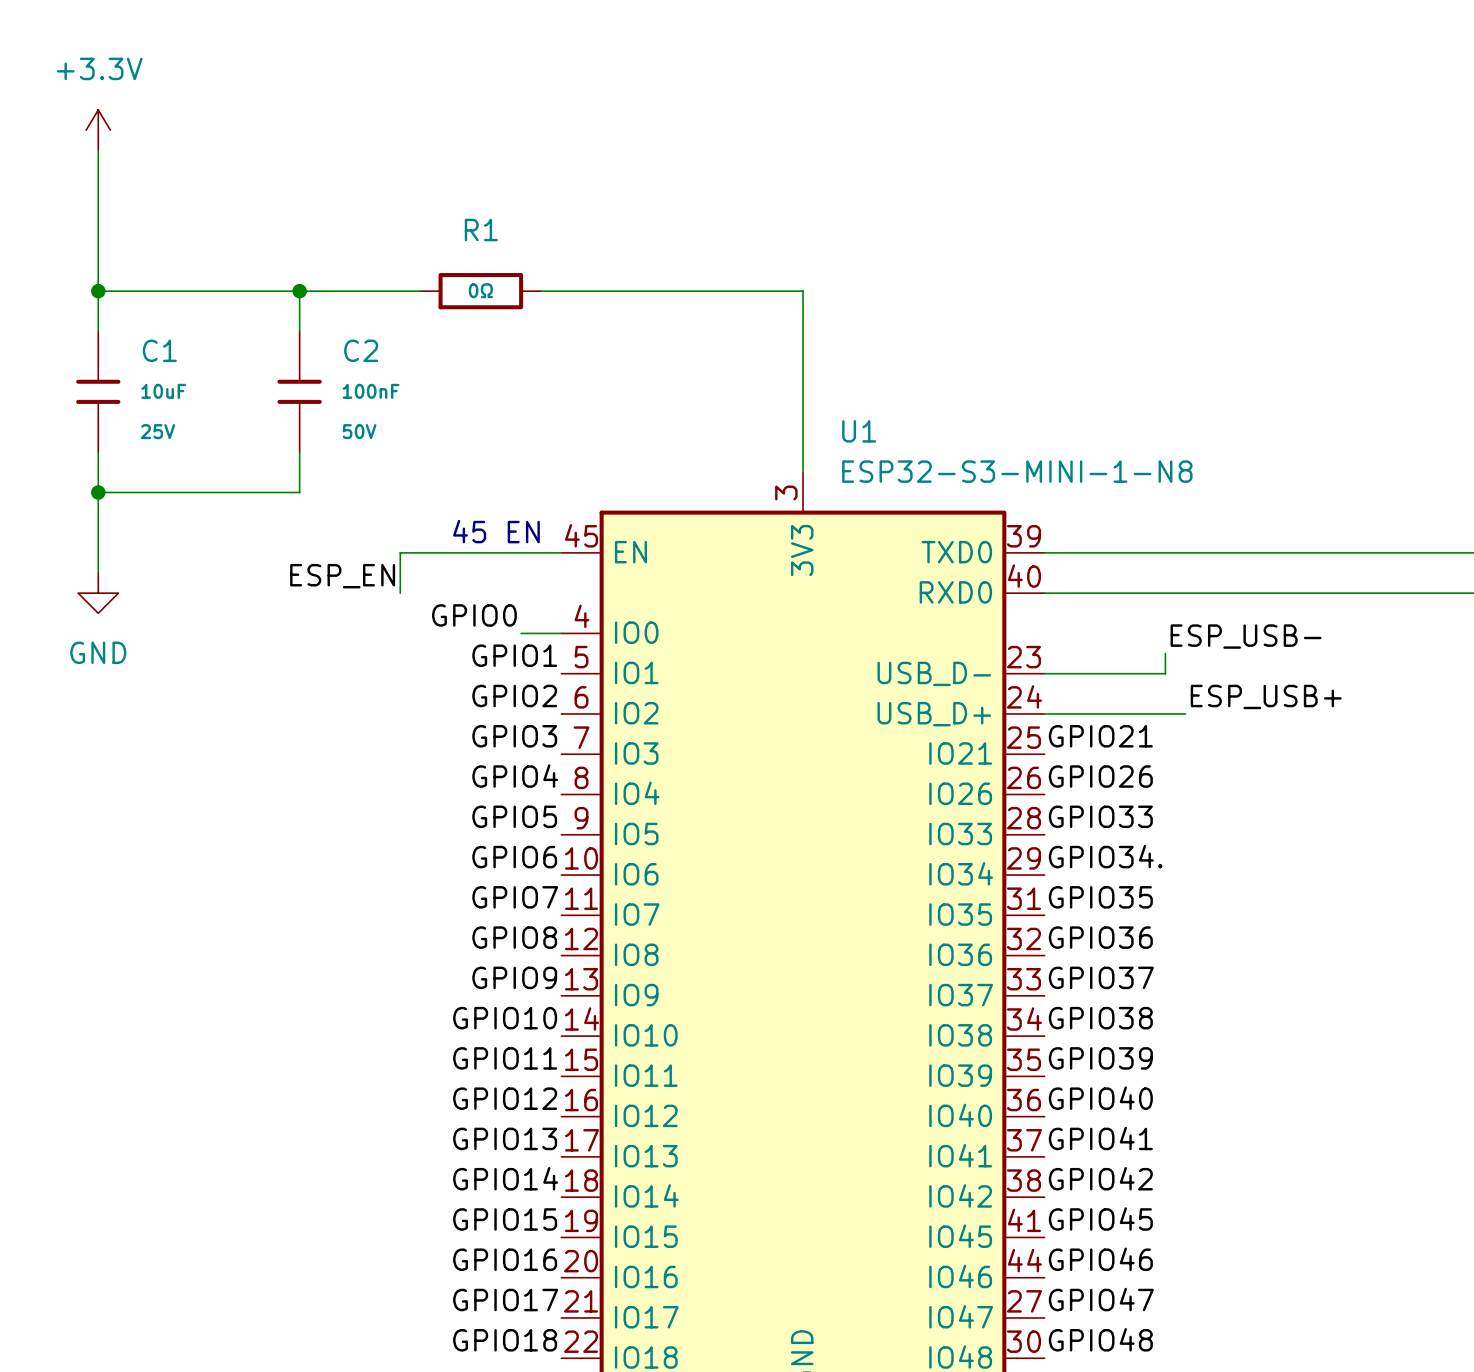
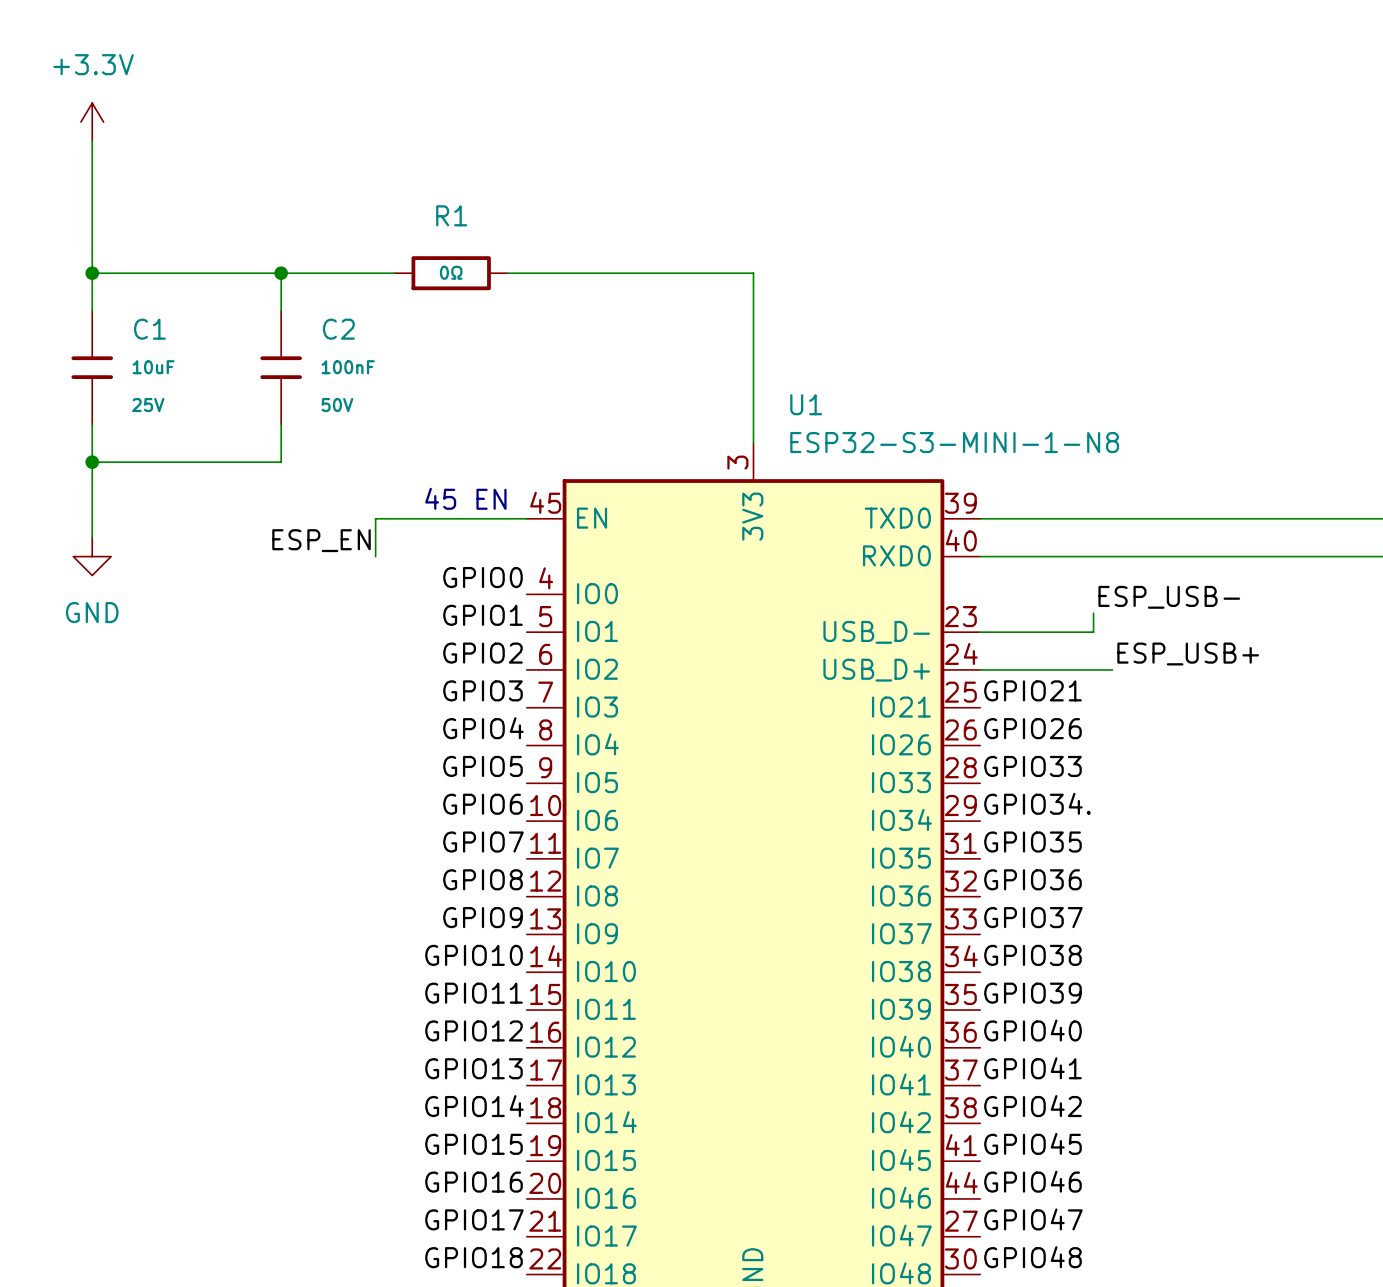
label position: GPIO0 (474, 615) -> GPIO0 (482, 577)
wire: (521, 633) (561, 633) -> none

